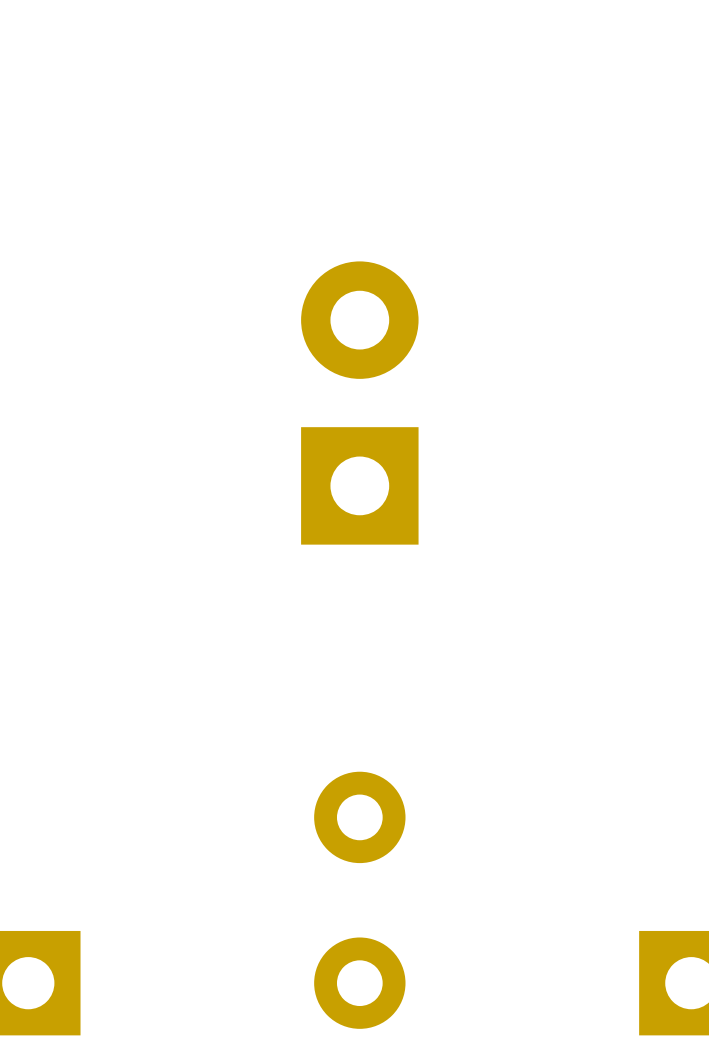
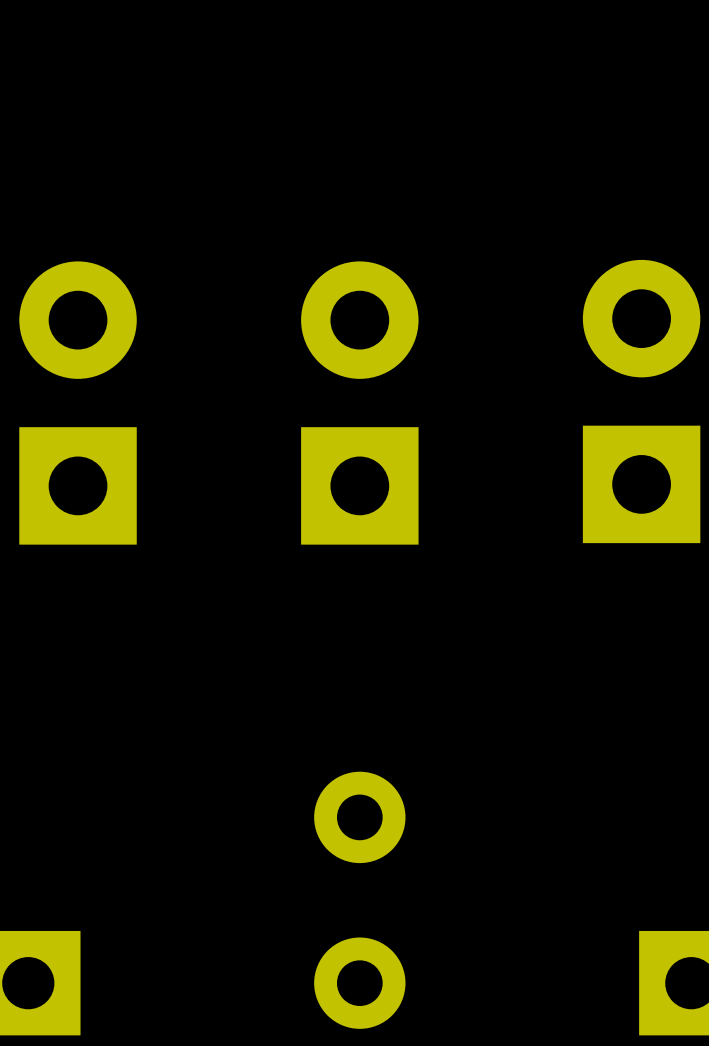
part: none -> (641, 401)
part: none -> (78, 403)

